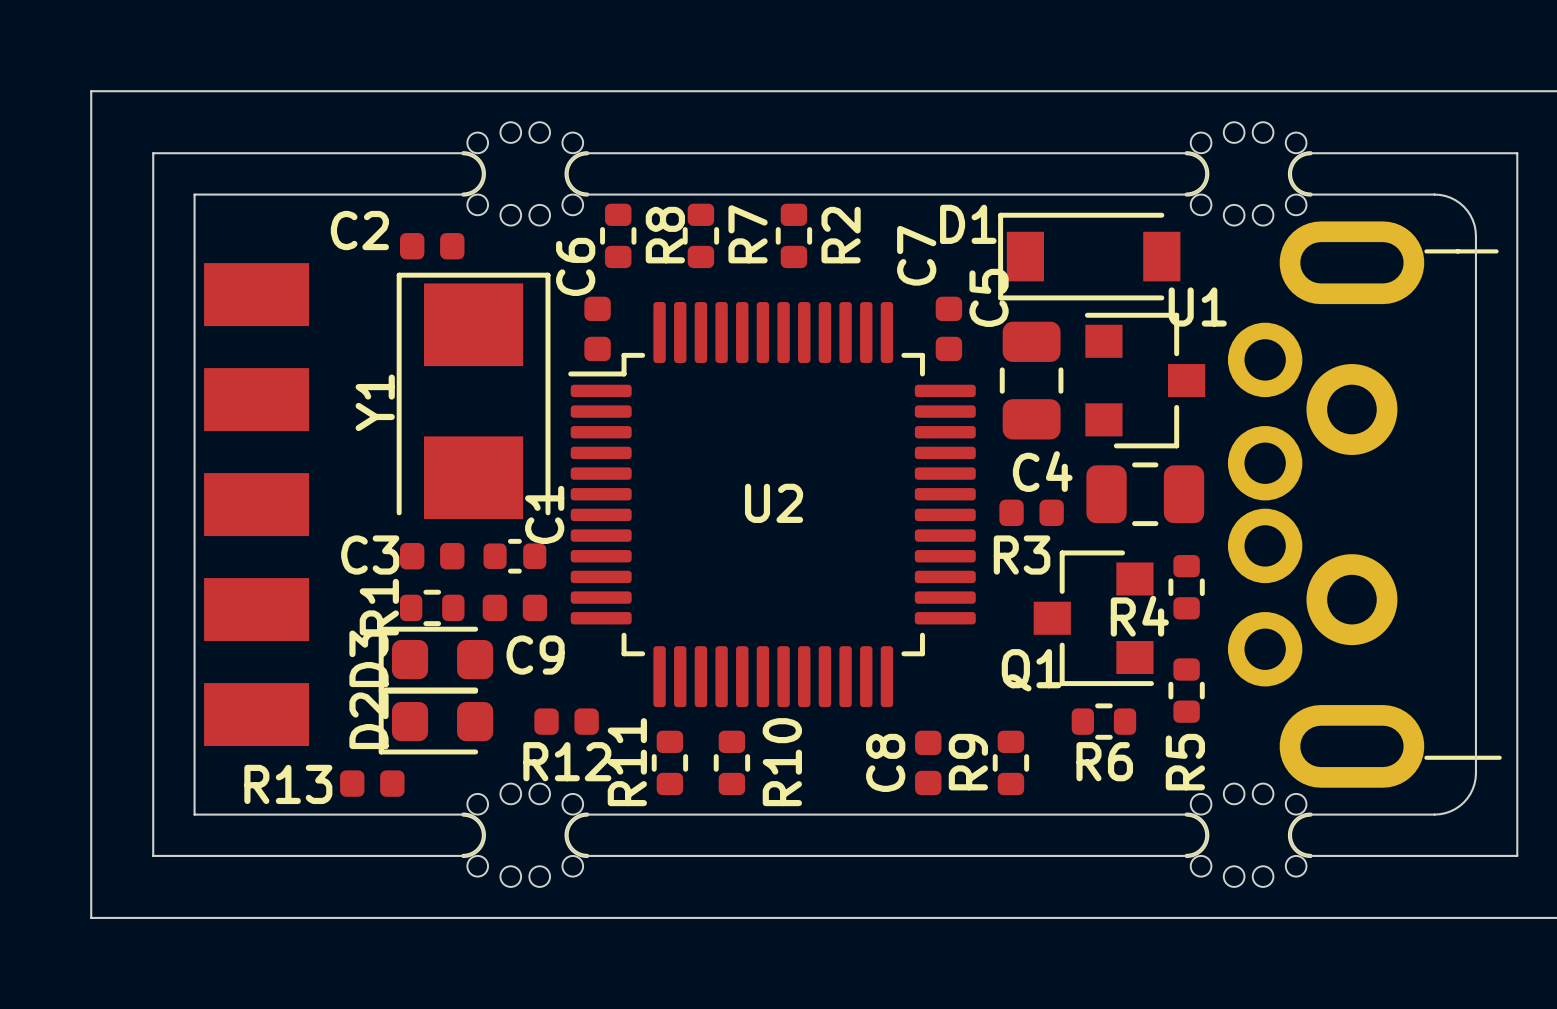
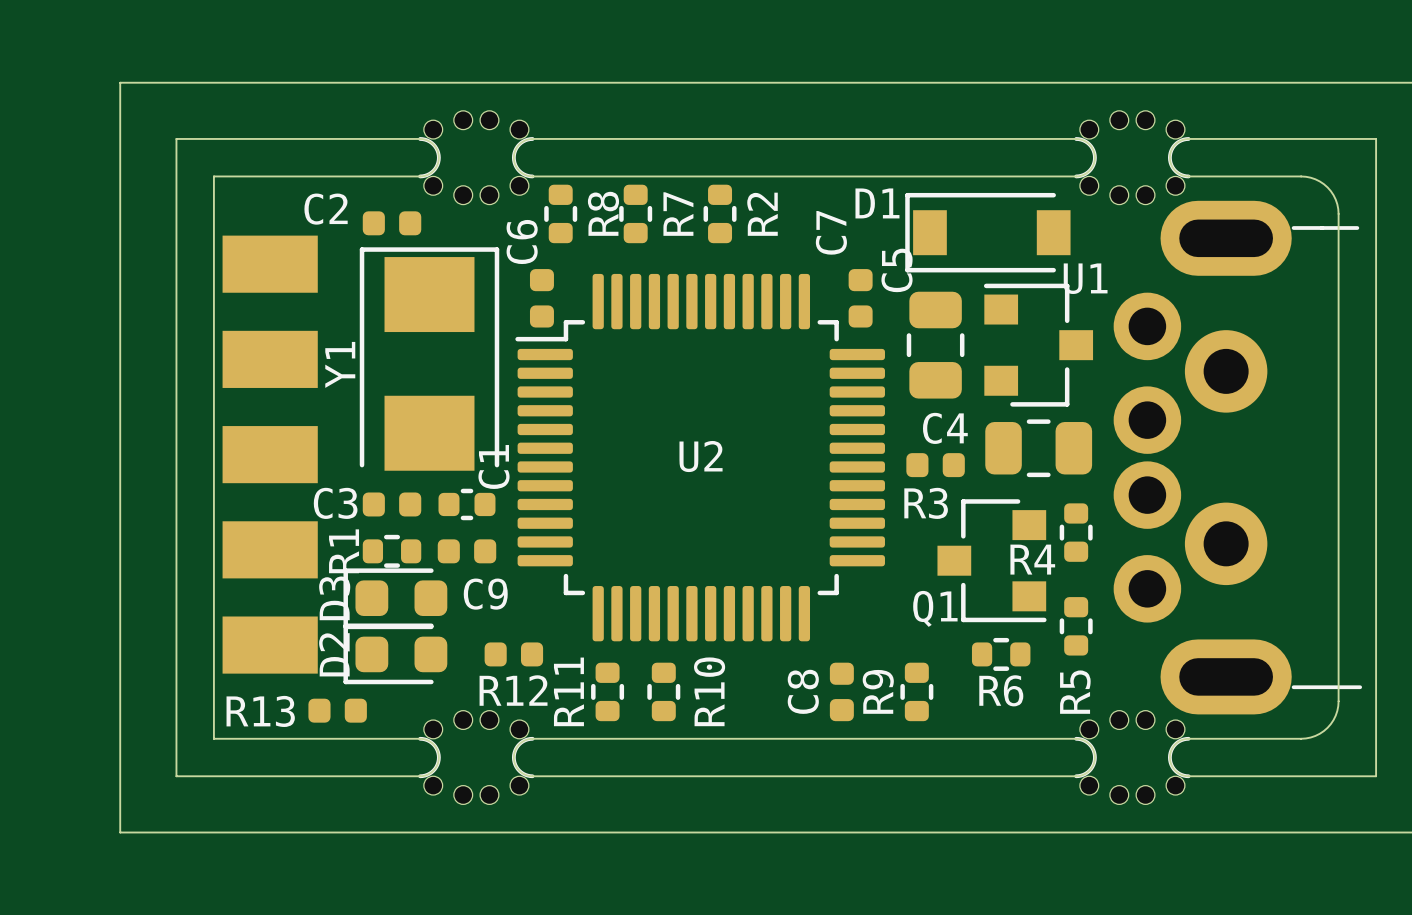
board edge: (132, 91) (91, 91) (91, 917) (132, 917) -> (120, 82) (120, 832)
board edge: (194, 153) (153, 153) (153, 855) (194, 855) -> none
board edge: (194, 194) (235, 194) -> (176, 176) (176, 138)
board edge: none -> (213, 176) (213, 738)
part position: (256, 504) -> (270, 454)
board edge: (194, 814) (235, 814) -> (176, 738) (176, 776)

